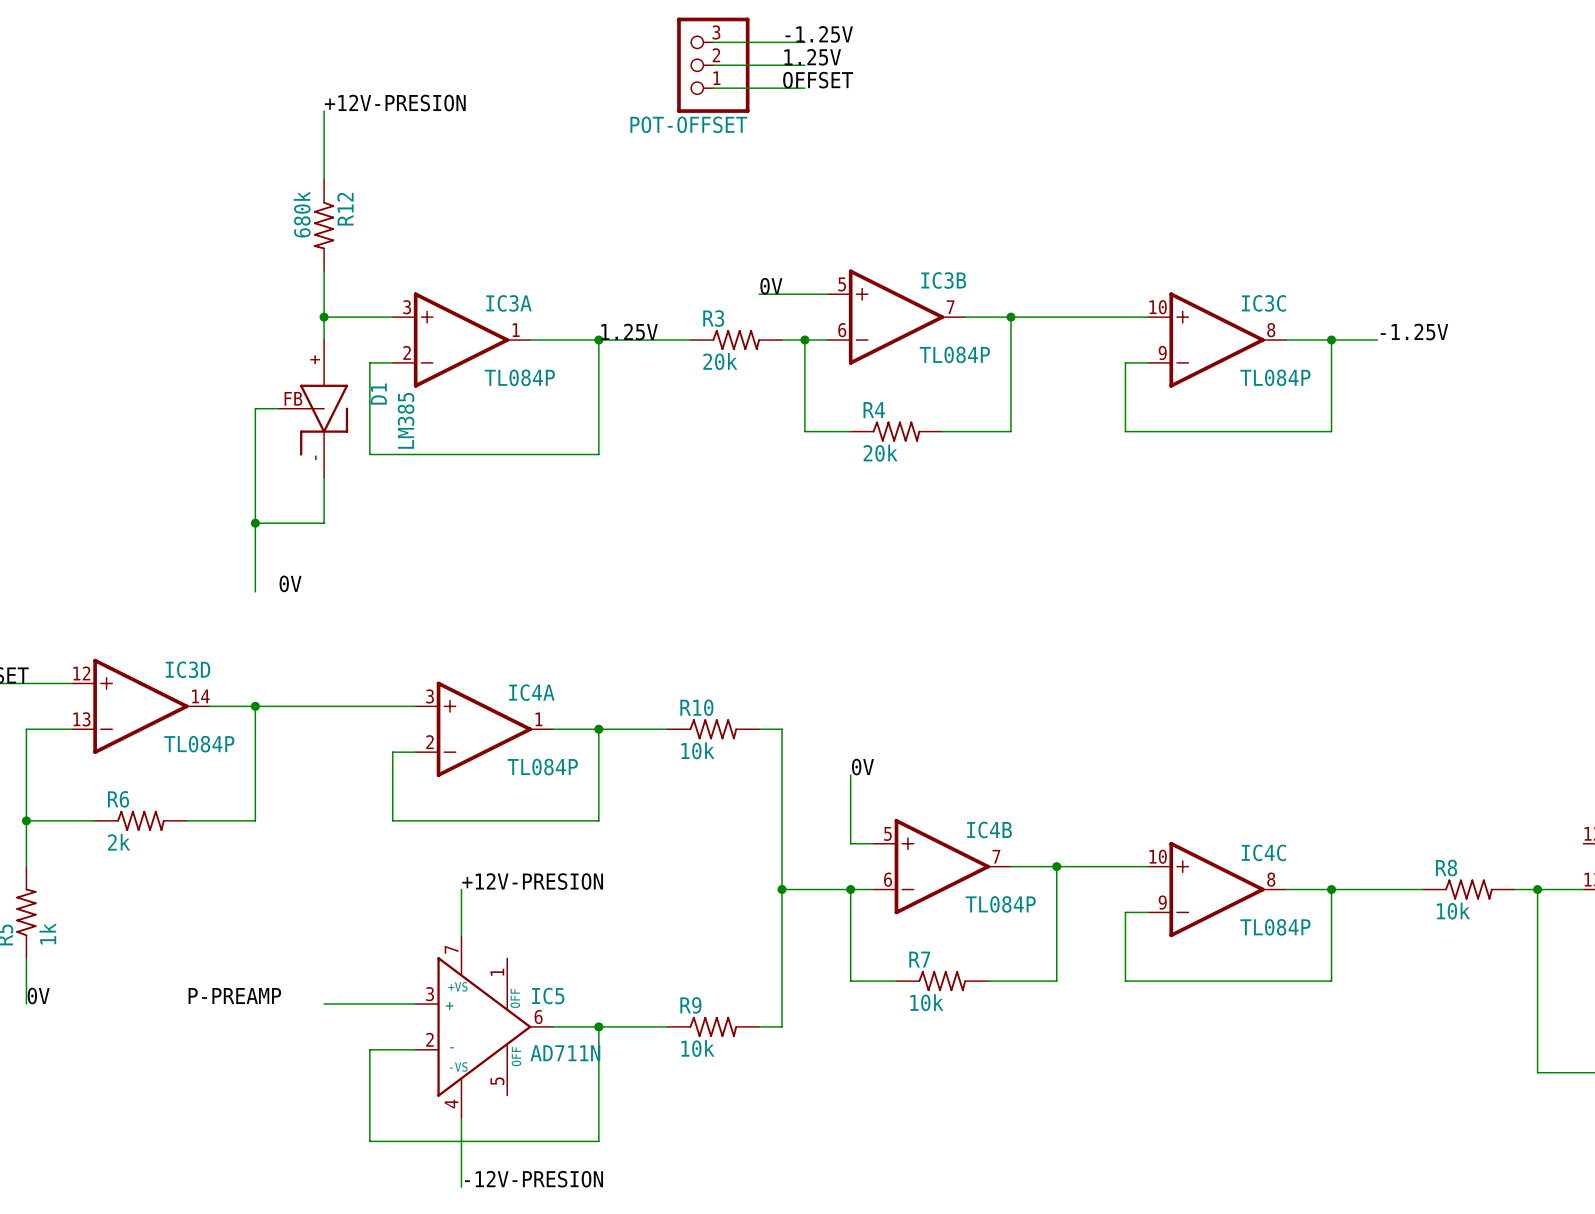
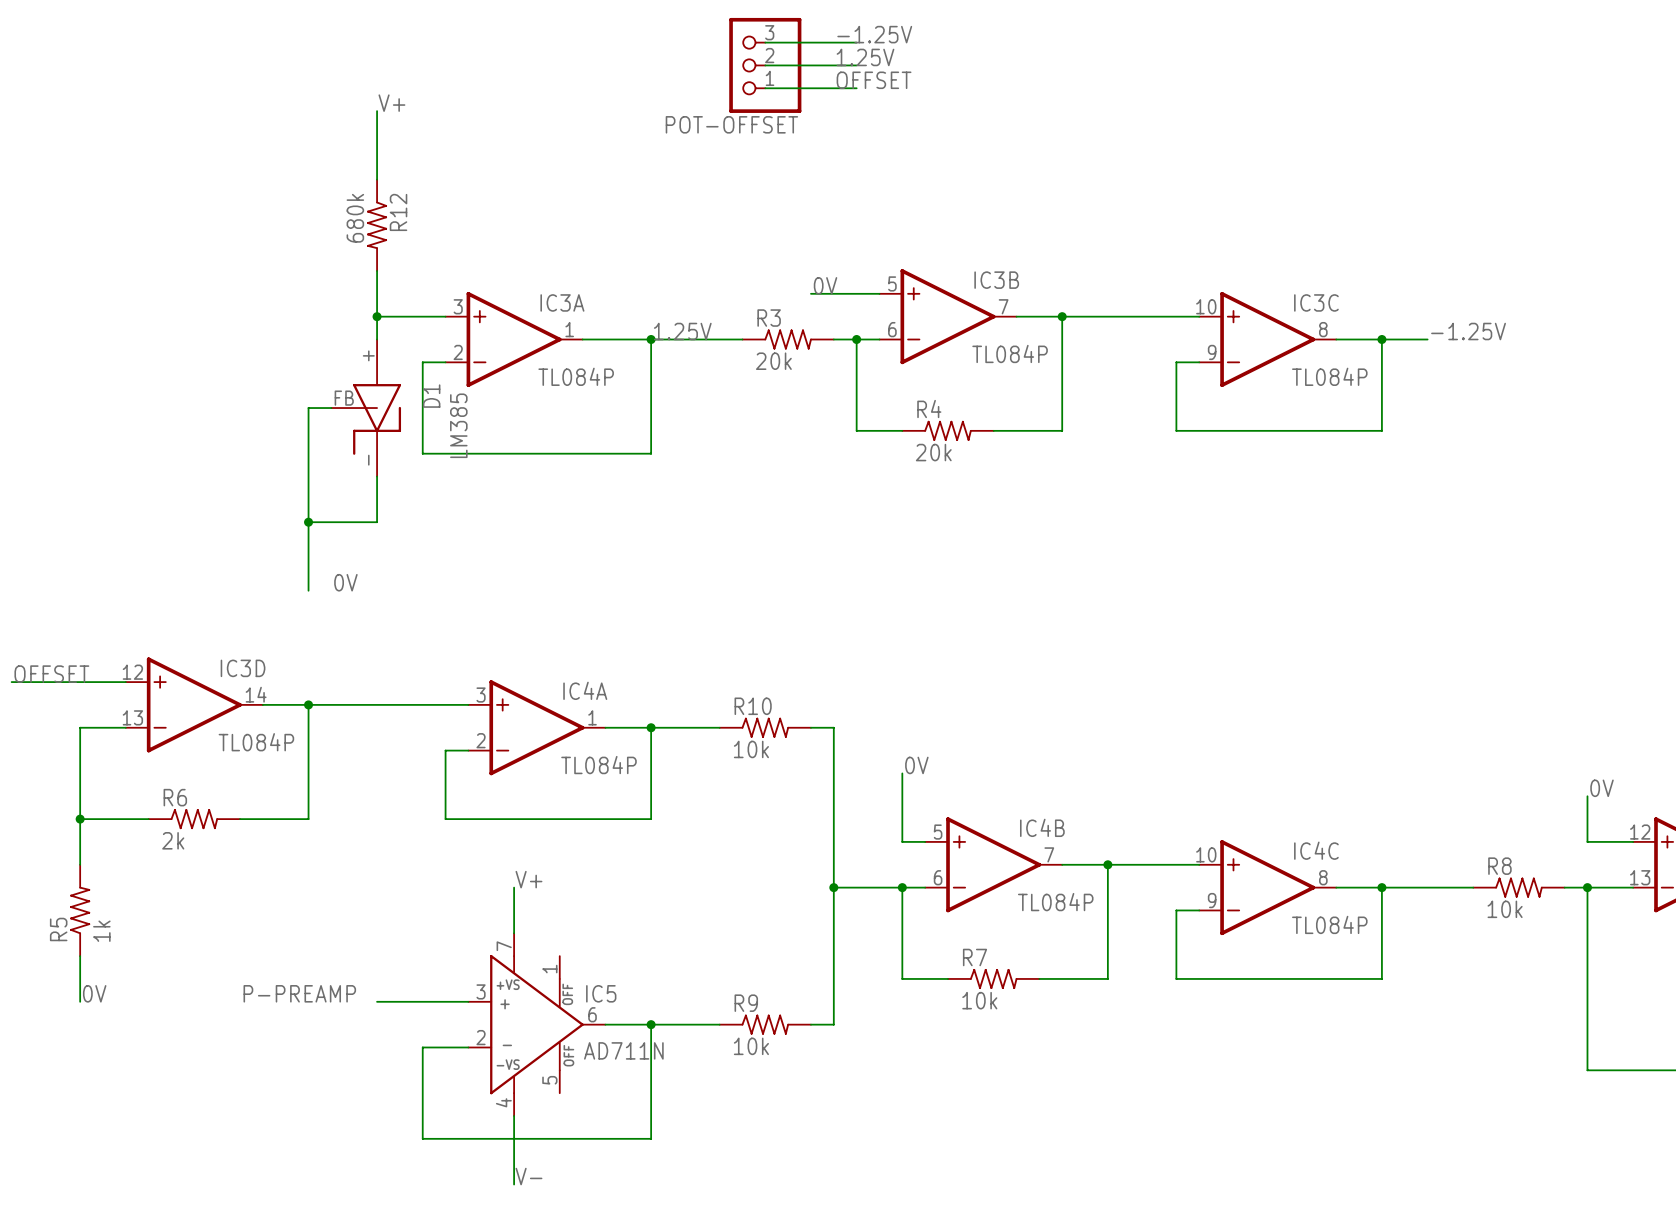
label: +12V-PRESION (395, 103) -> V+ (391, 103)
label: none -> 0V (1602, 788)
wire: none -> (1587, 796) (1587, 841) (1633, 841)
label: +12V-PRESION (532, 881) -> V+ (528, 879)
label: -12V-PRESION (533, 1179) -> V- (528, 1176)

